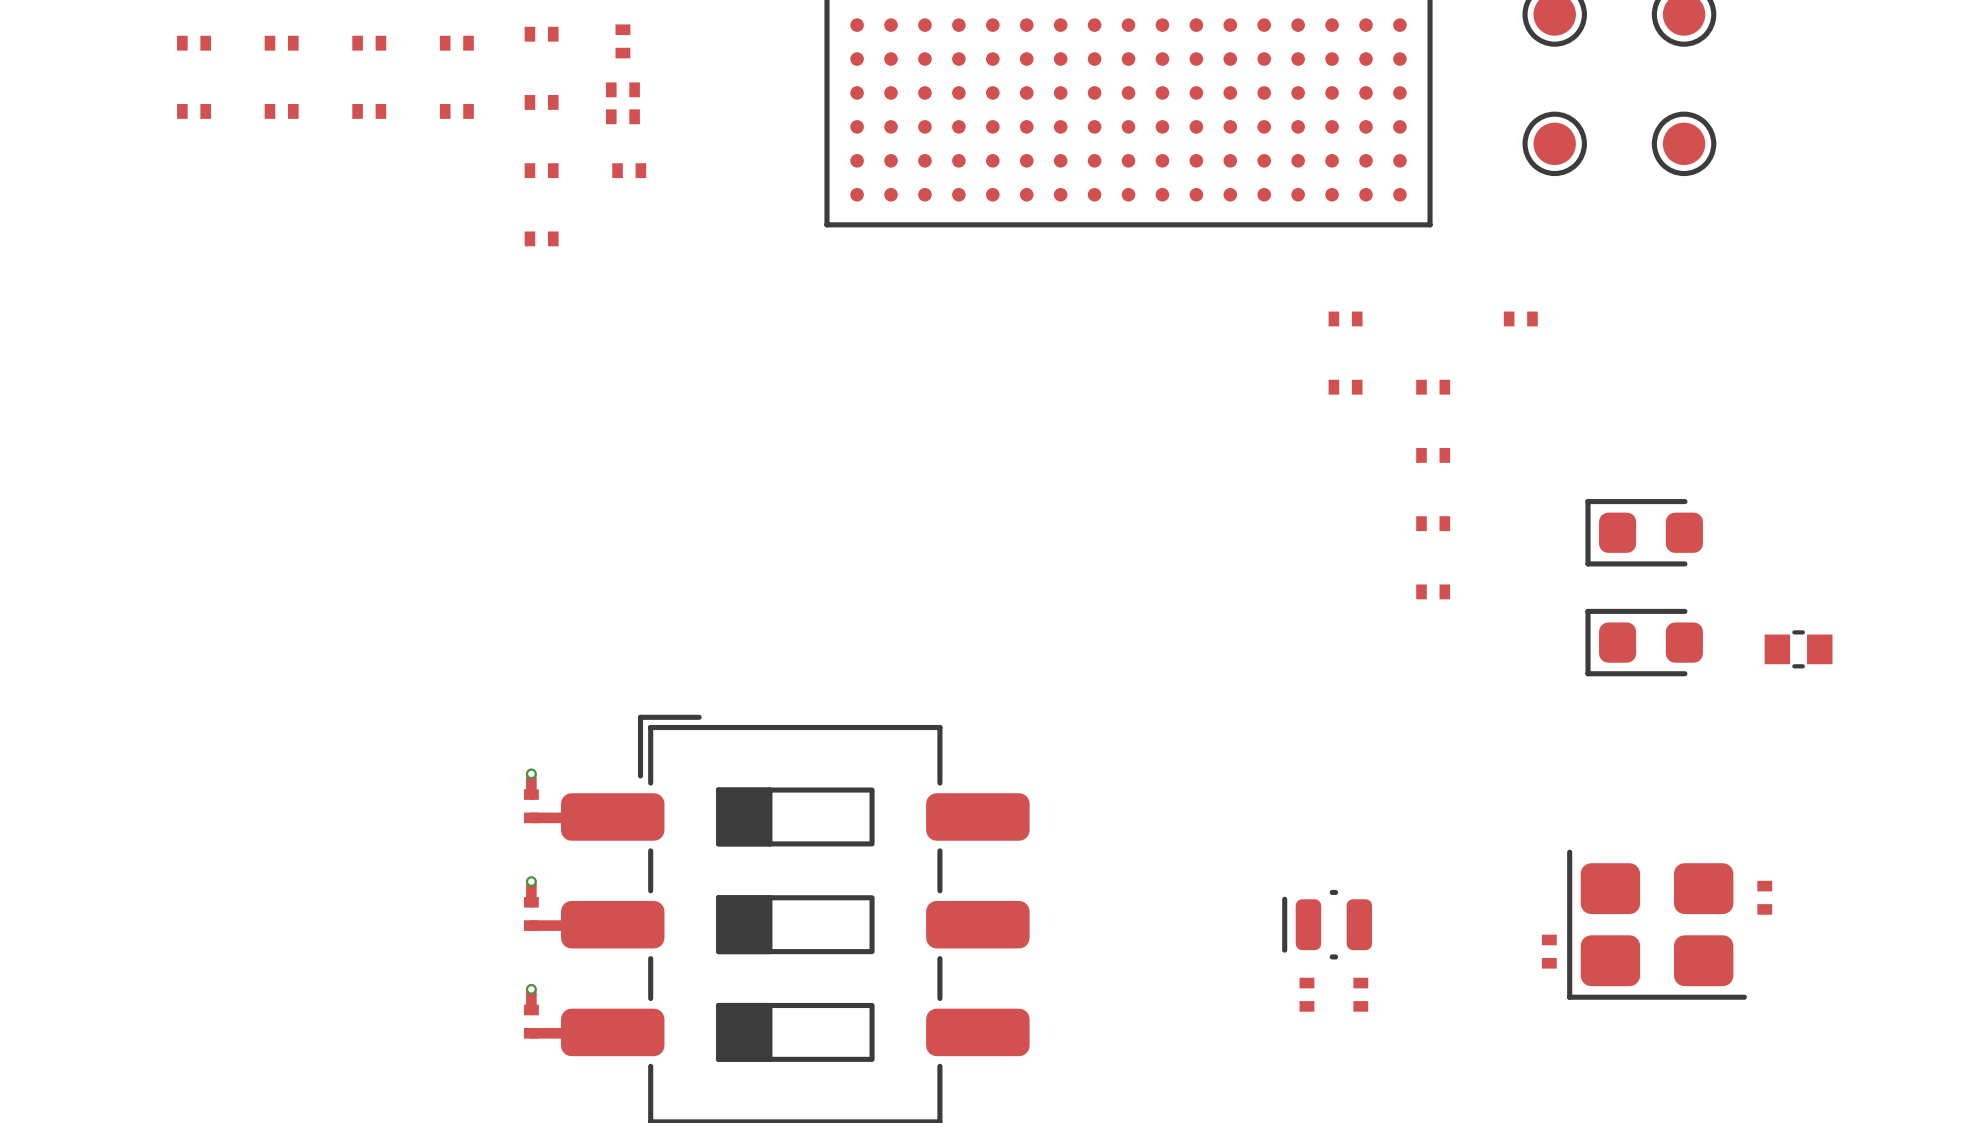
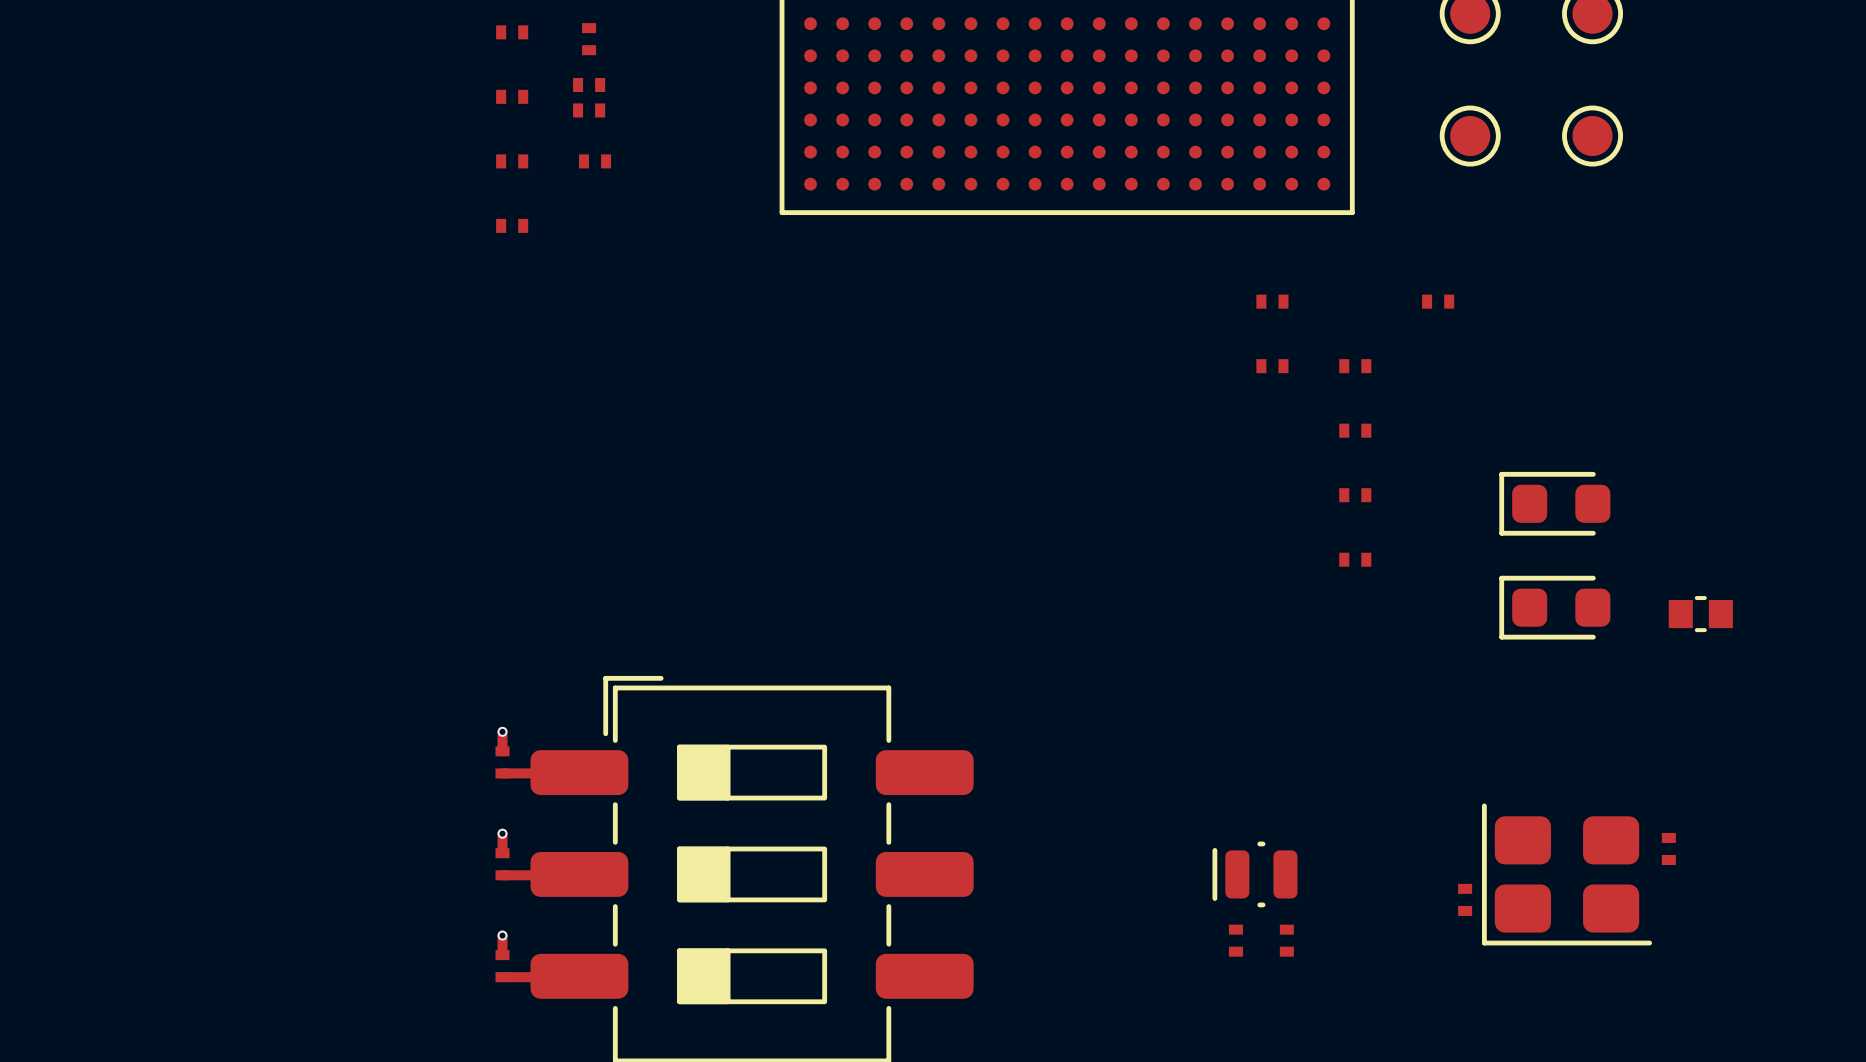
part: (194, 43) -> none
part: (281, 43) -> none
part: (369, 43) -> none
part: (456, 43) -> none
part: (194, 111) -> none
part: (281, 111) -> none
part: (369, 111) -> none
part: (456, 111) -> none

